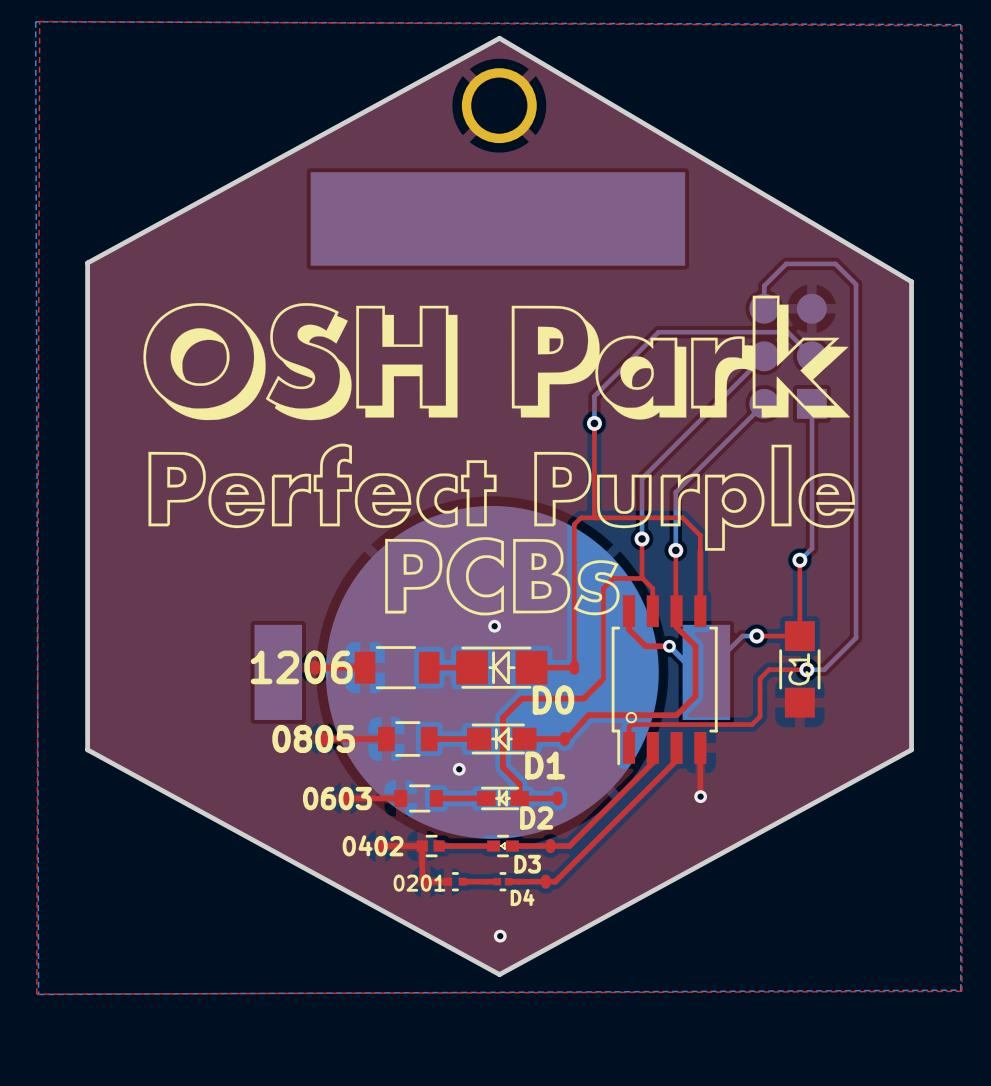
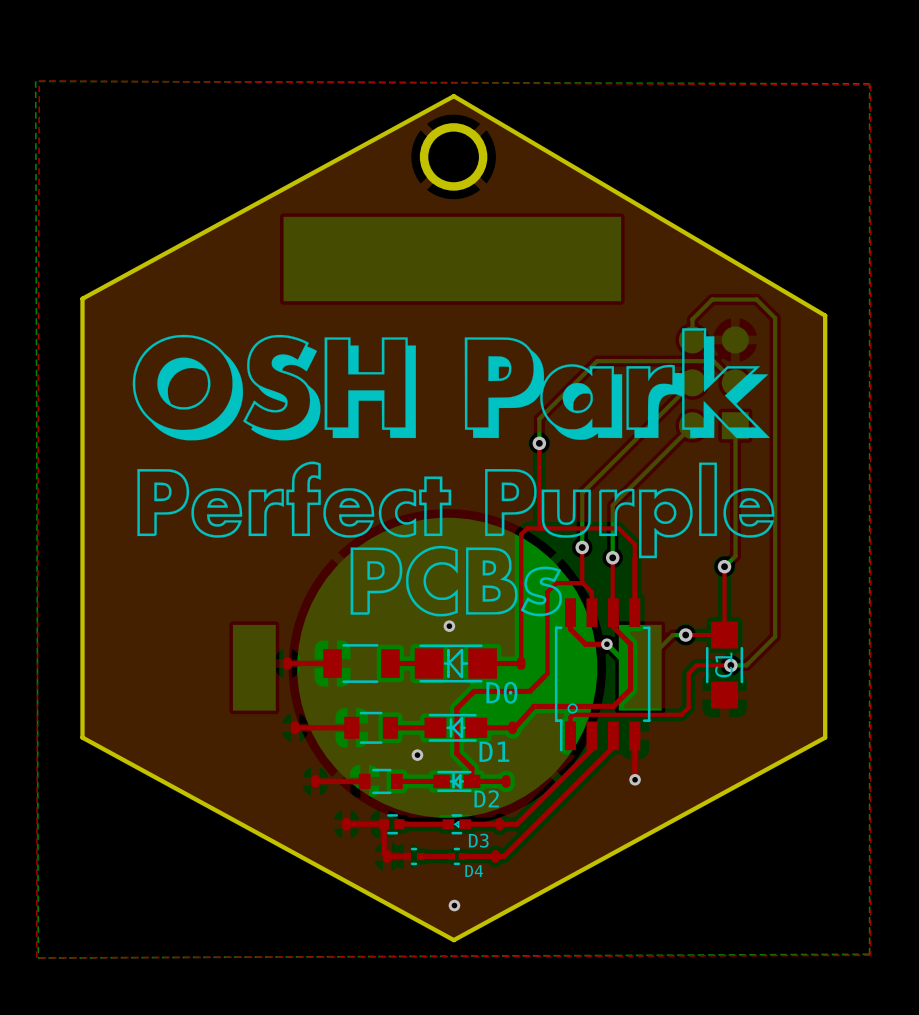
text: 1206 (301, 667) -> none
text: 0805 (313, 738) -> none
text: 0603 (337, 798) -> none
text: 0402 (373, 845) -> none
text: 0201 (419, 883) -> none

